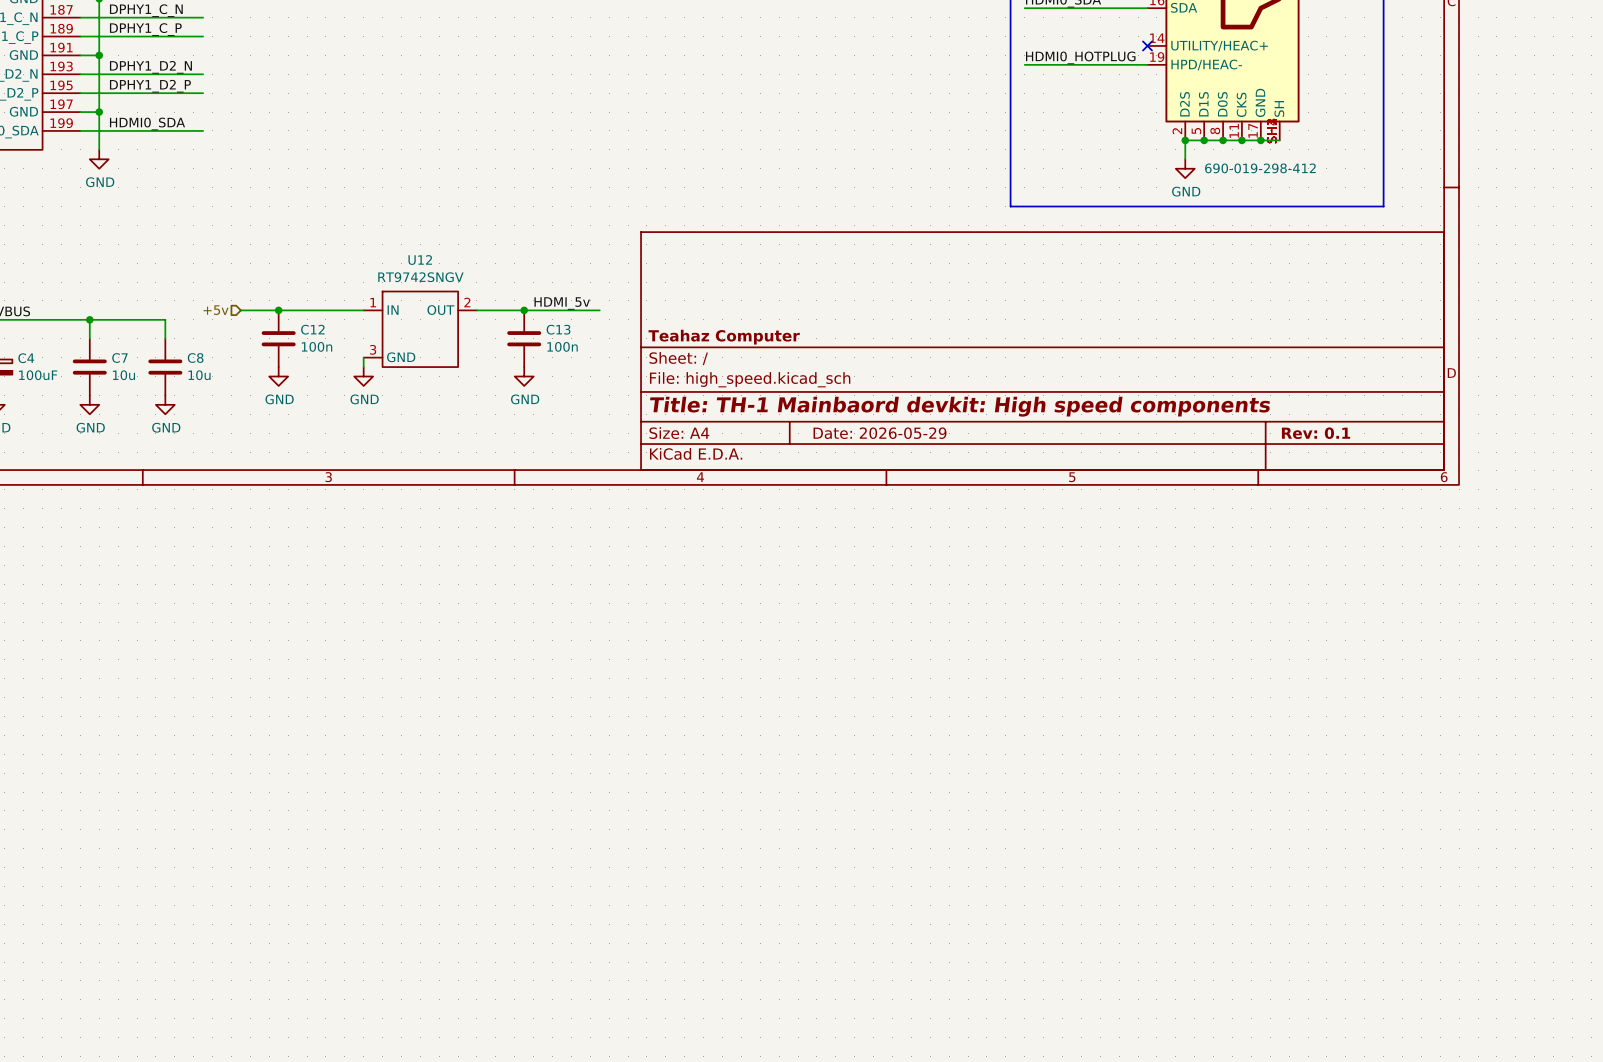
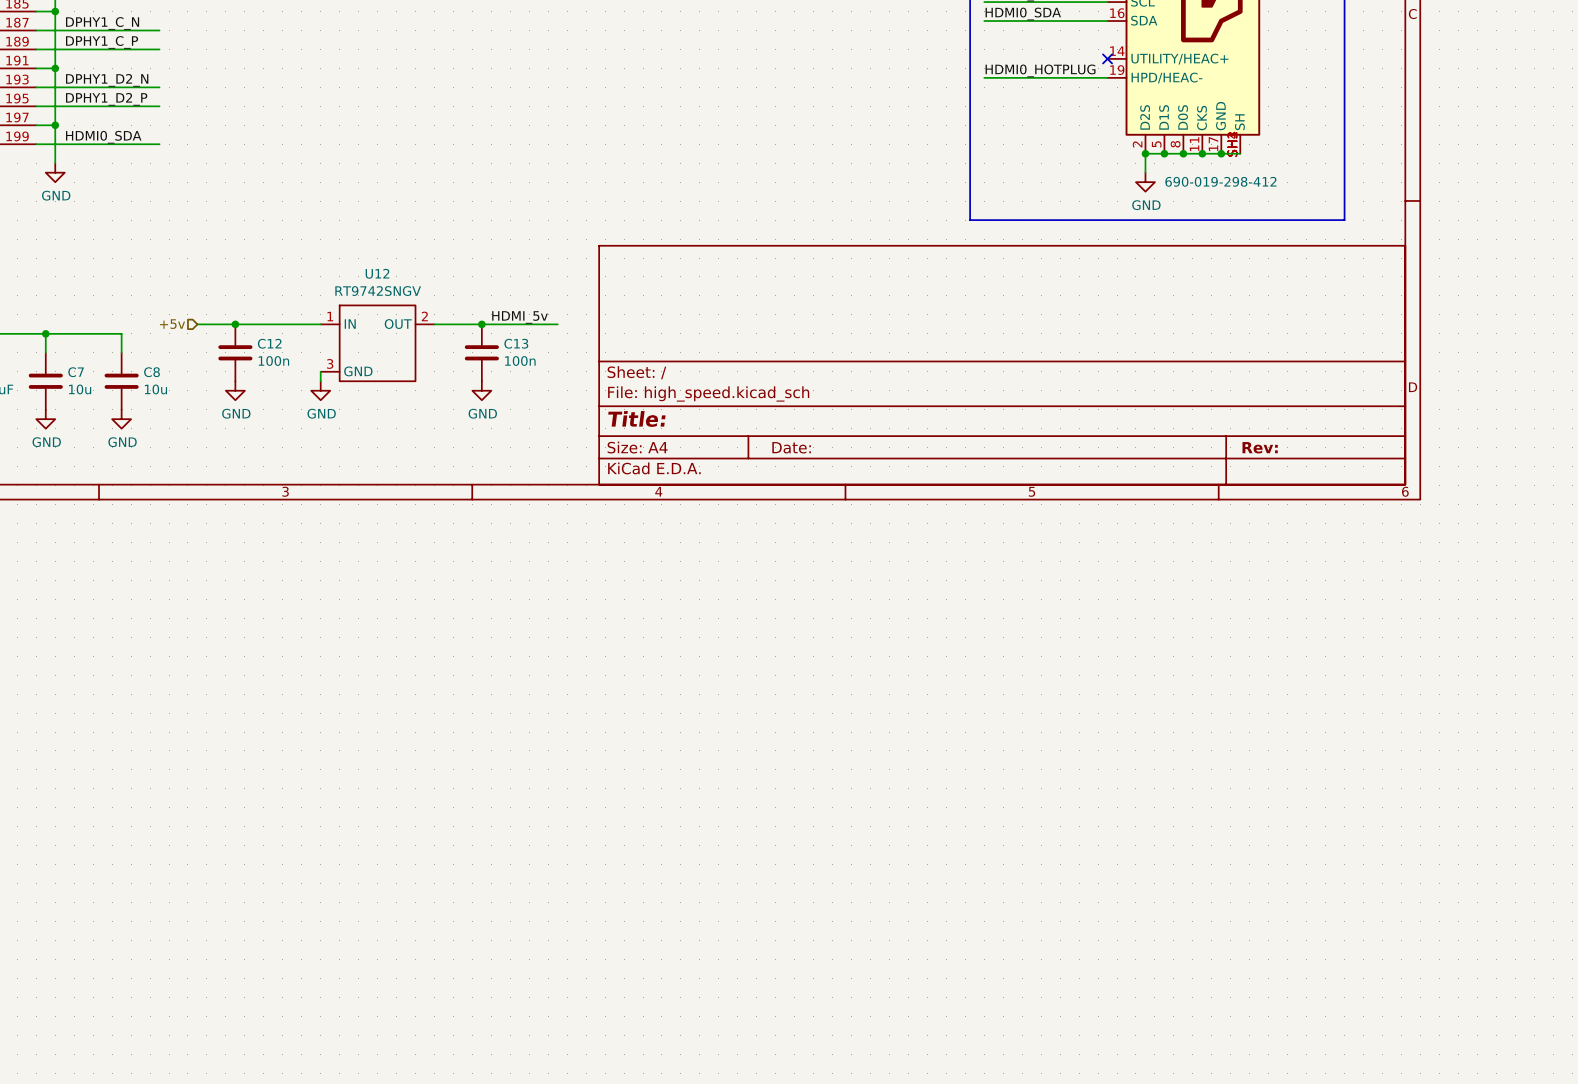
title block: Teahaz Computer (724, 337) -> none
title block: Title: TH-1 Mainbaord devkit: High speed components (959, 406) -> Title: (636, 418)
title block: Date: 2026-05-29 (880, 433) -> Date: (791, 447)
title block: Rev: 0.1 (1316, 433) -> Rev: (1260, 447)

